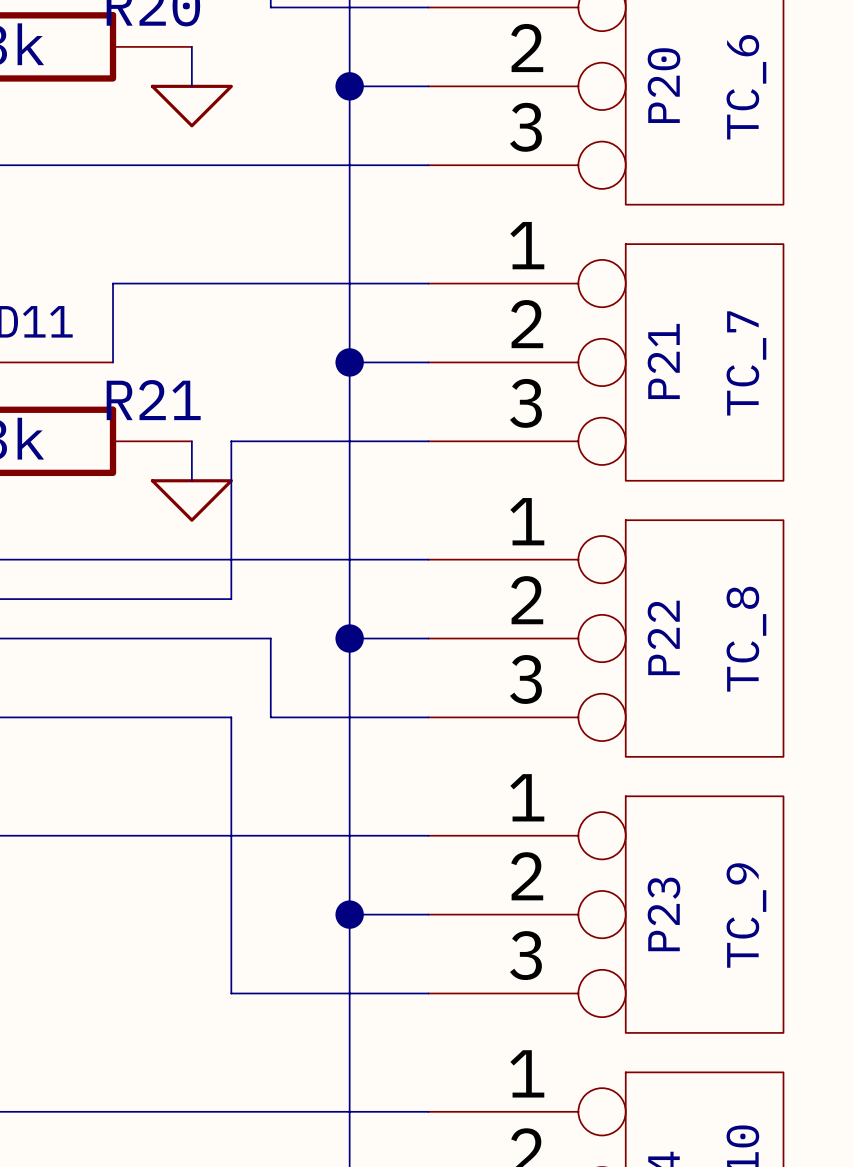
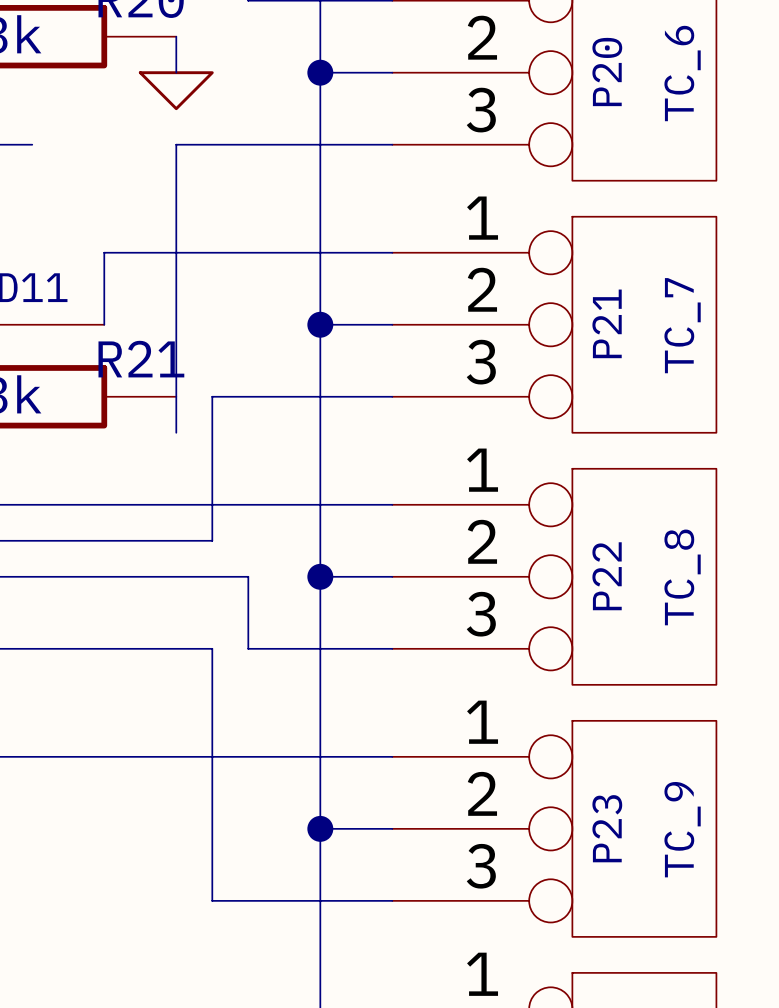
wire: (34, 165) (191, 165) -> (176, 396) (176, 144)
power symbol: (191, 500) -> none

